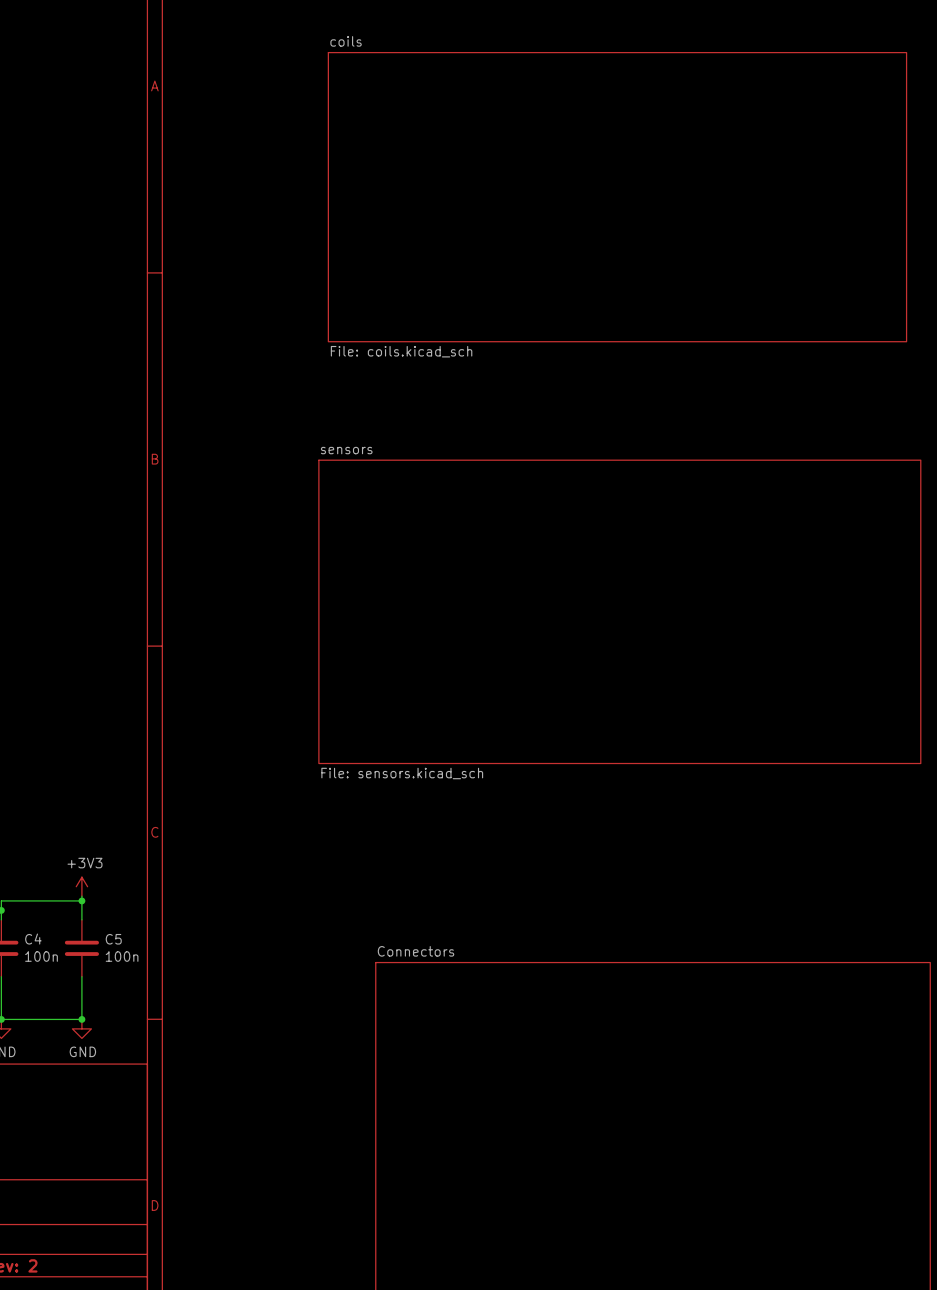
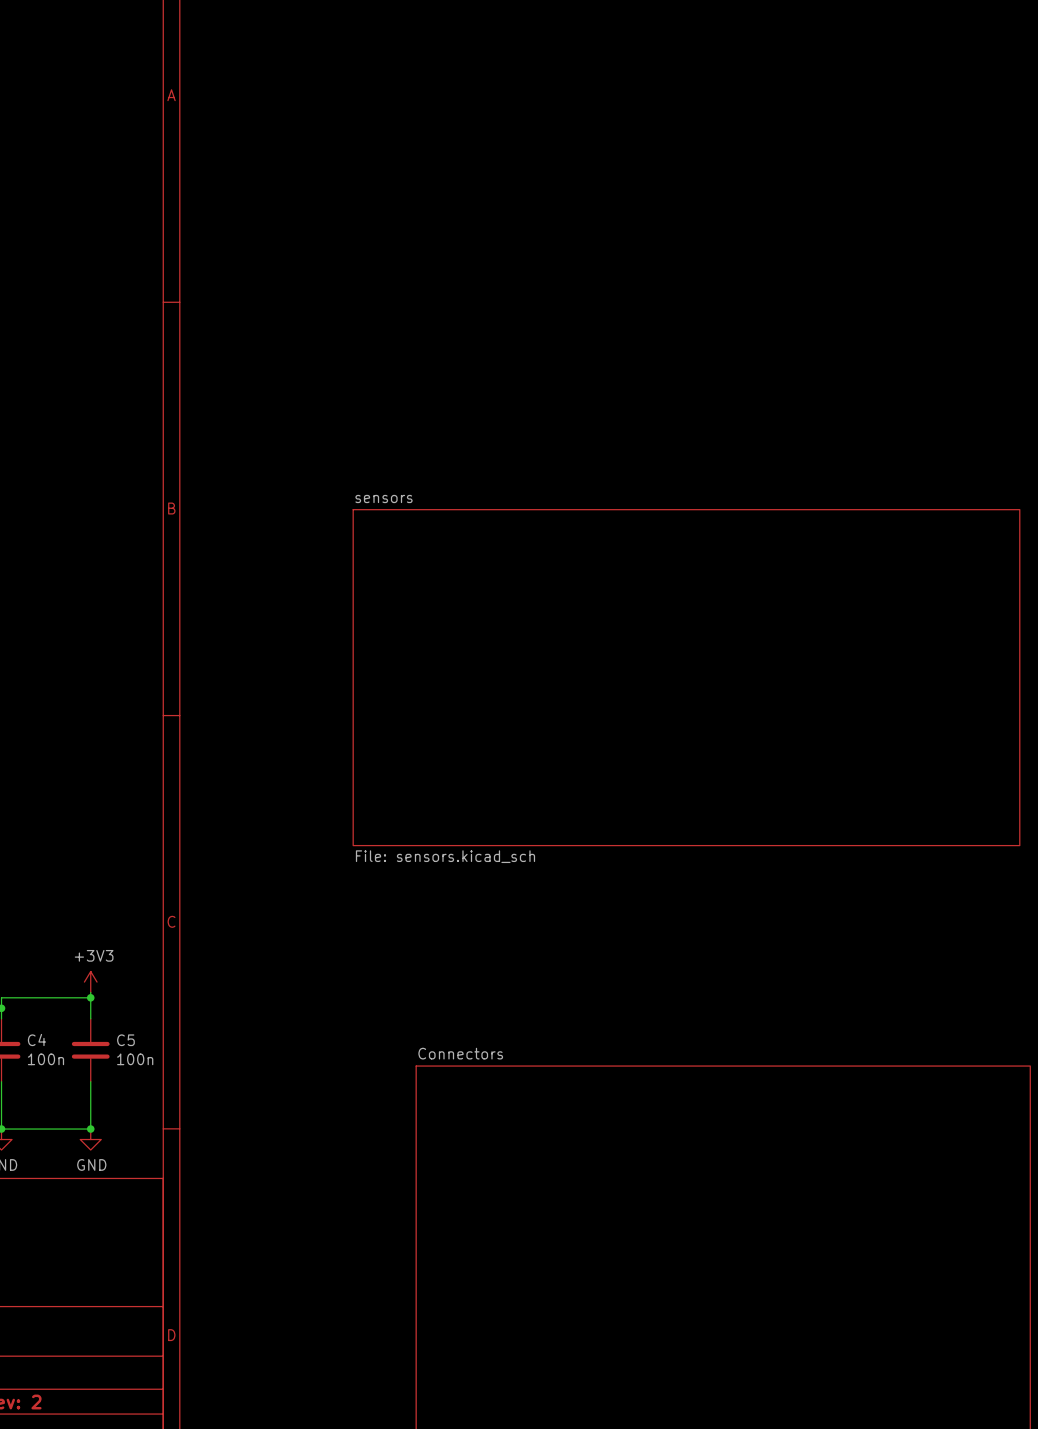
sheet coils: File: coils.kicad_sch (617, 197) -> none

